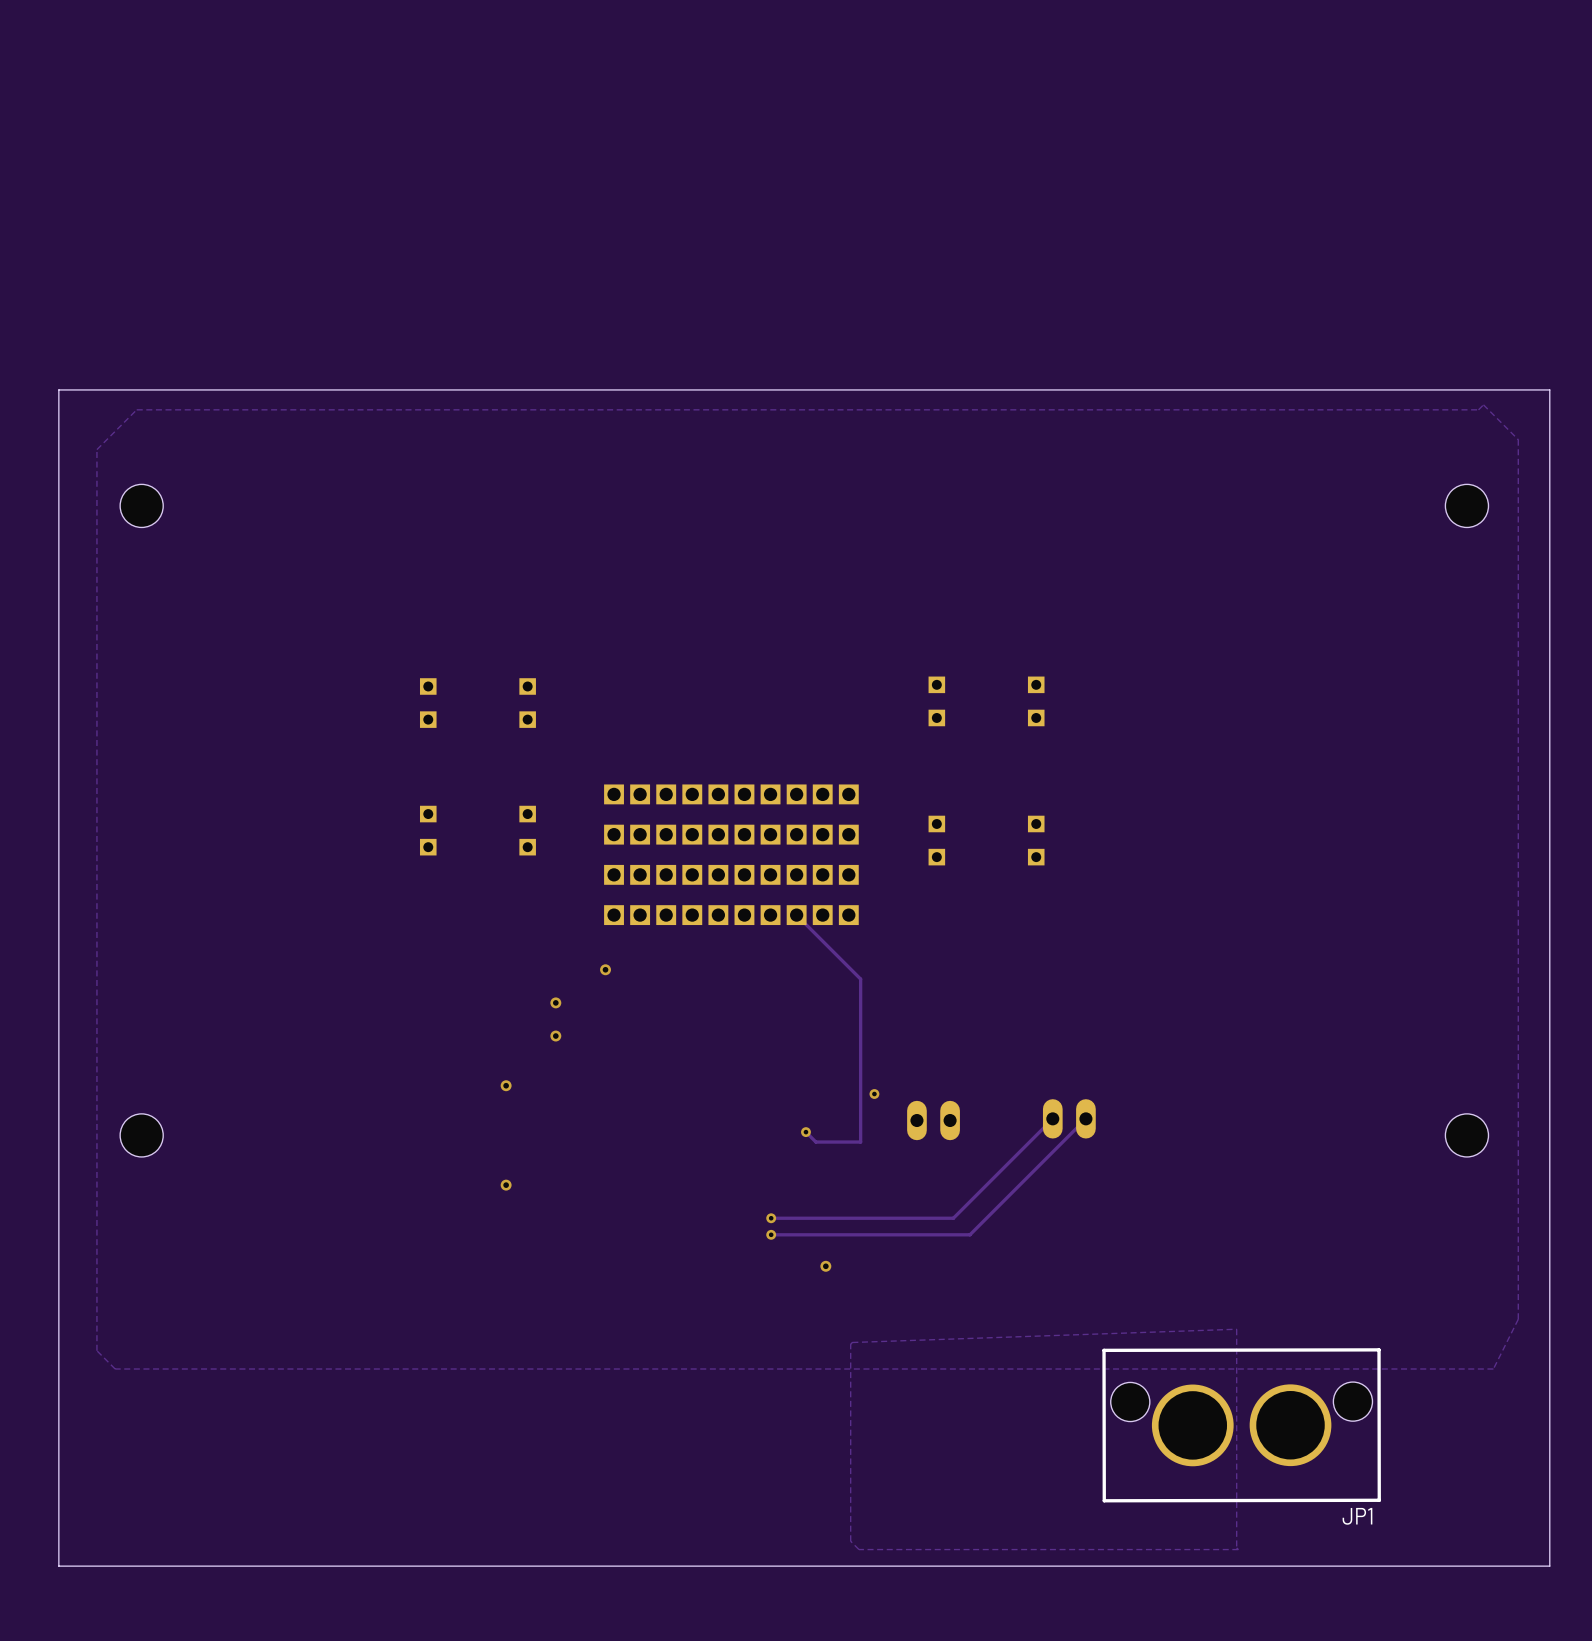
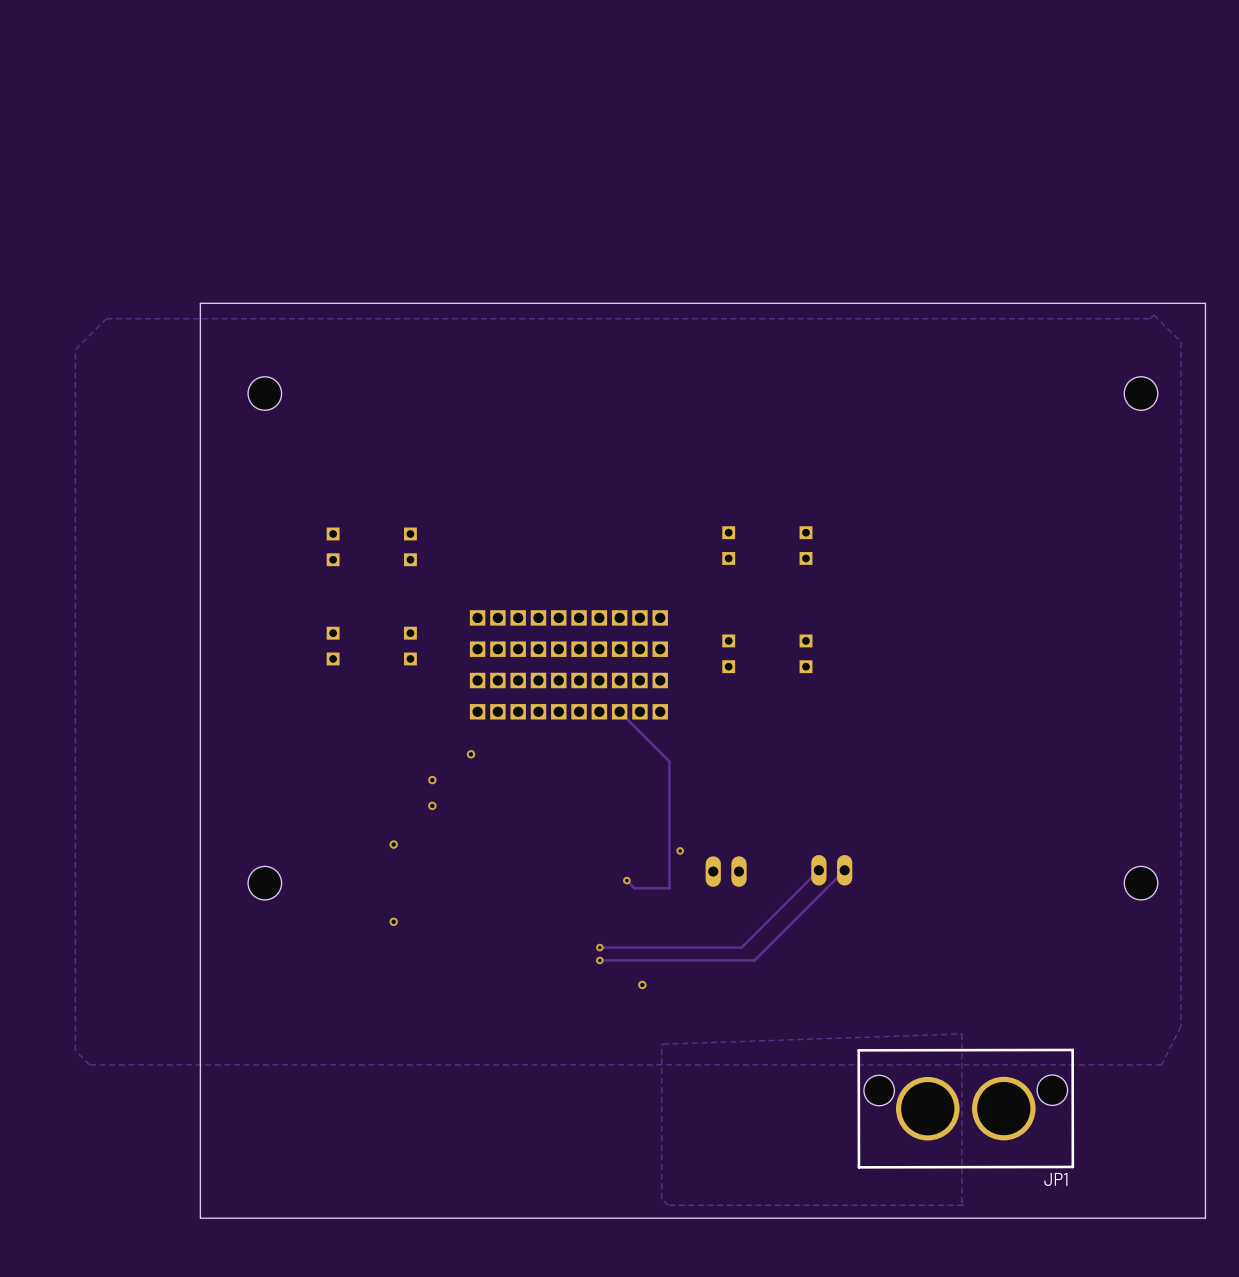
board edge: (257, 389) (58, 389) (58, 1566) (257, 1566) -> (200, 303) (200, 1218)
hole position: (141, 505) -> (264, 393)
hole position: (141, 1135) -> (264, 883)

